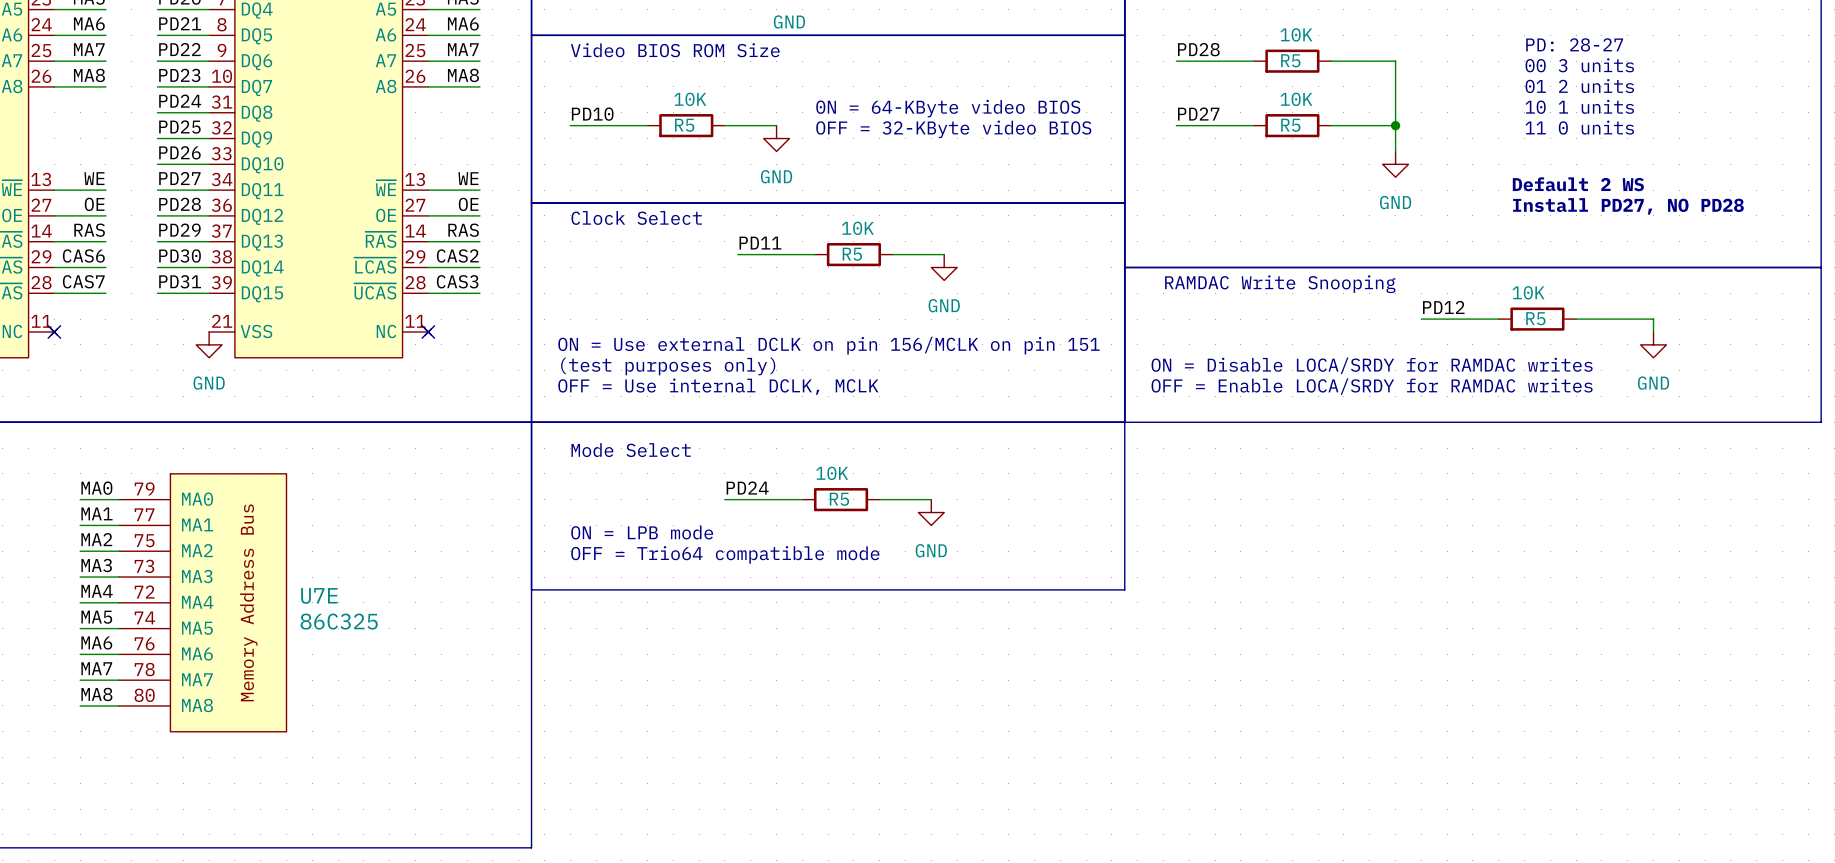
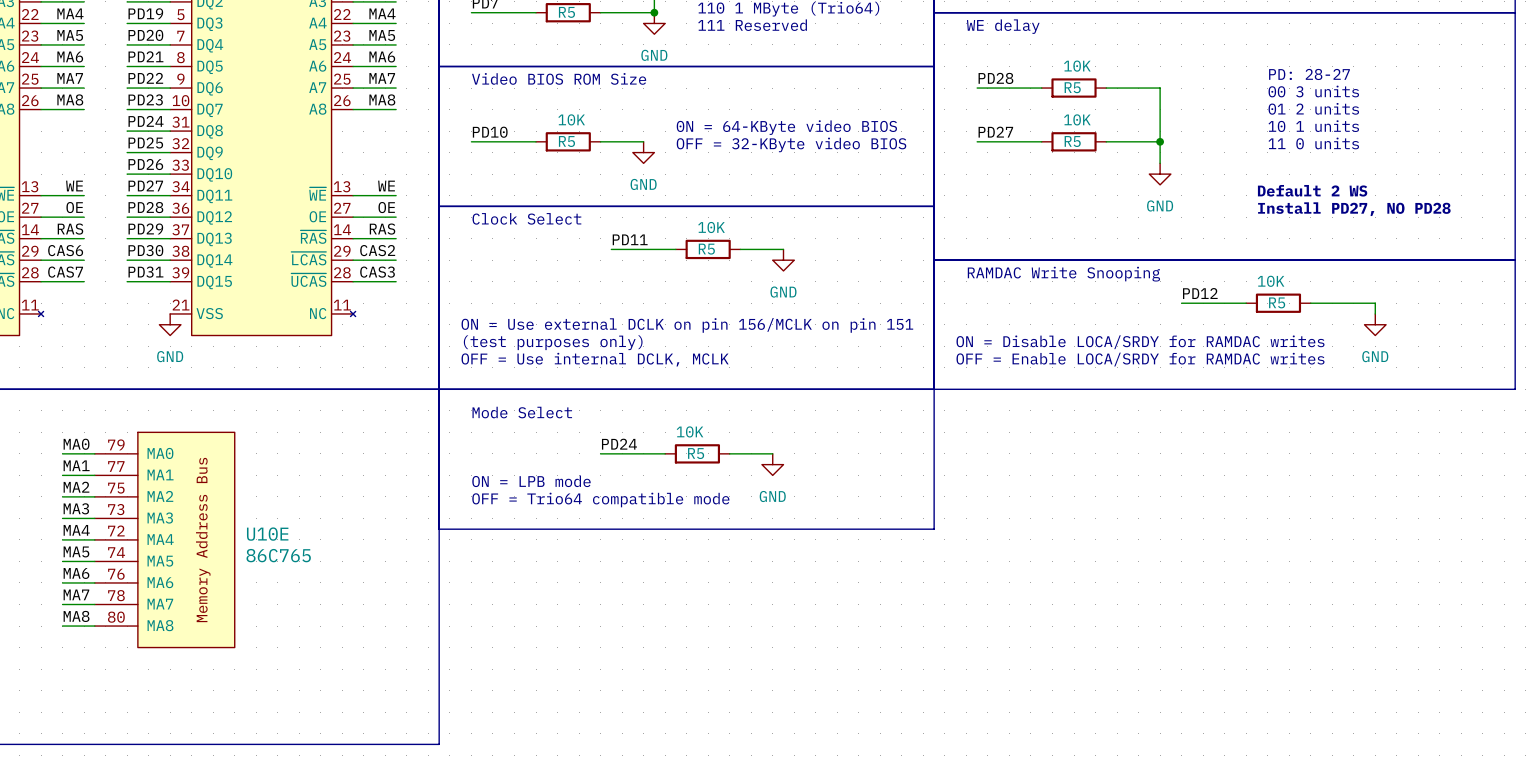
no-connect mark: (54, 331) -> none
no-connect mark: (428, 331) -> none
U7E name: U7E (319, 595) -> U10E (267, 534)
U7E value: 86C325 (339, 621) -> 86C765 (278, 555)

